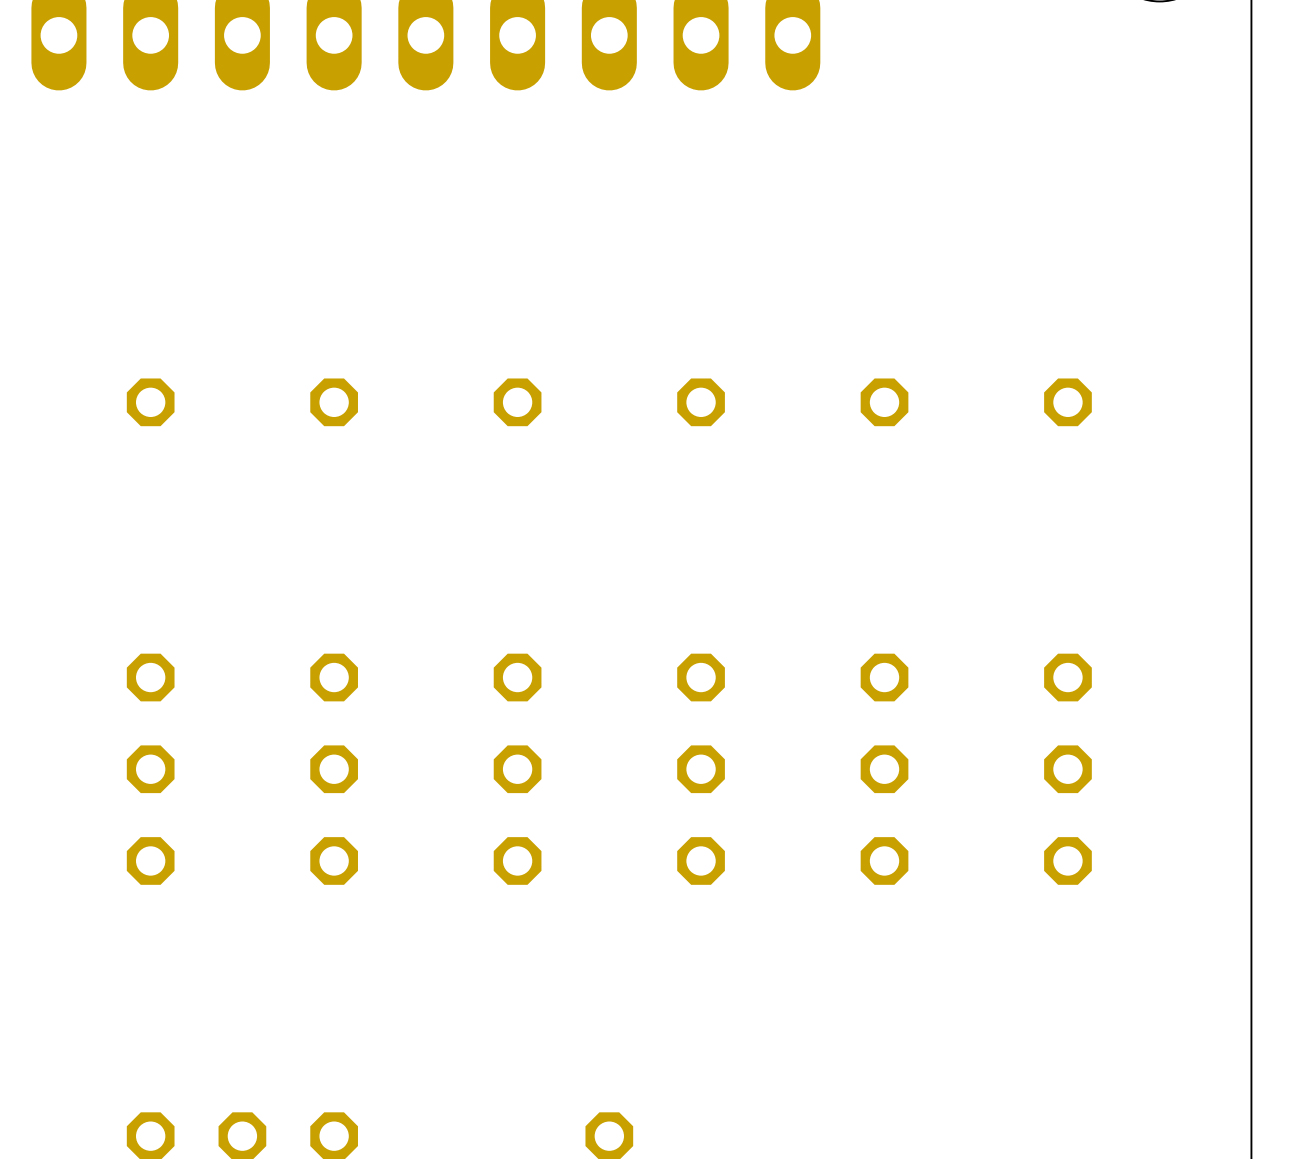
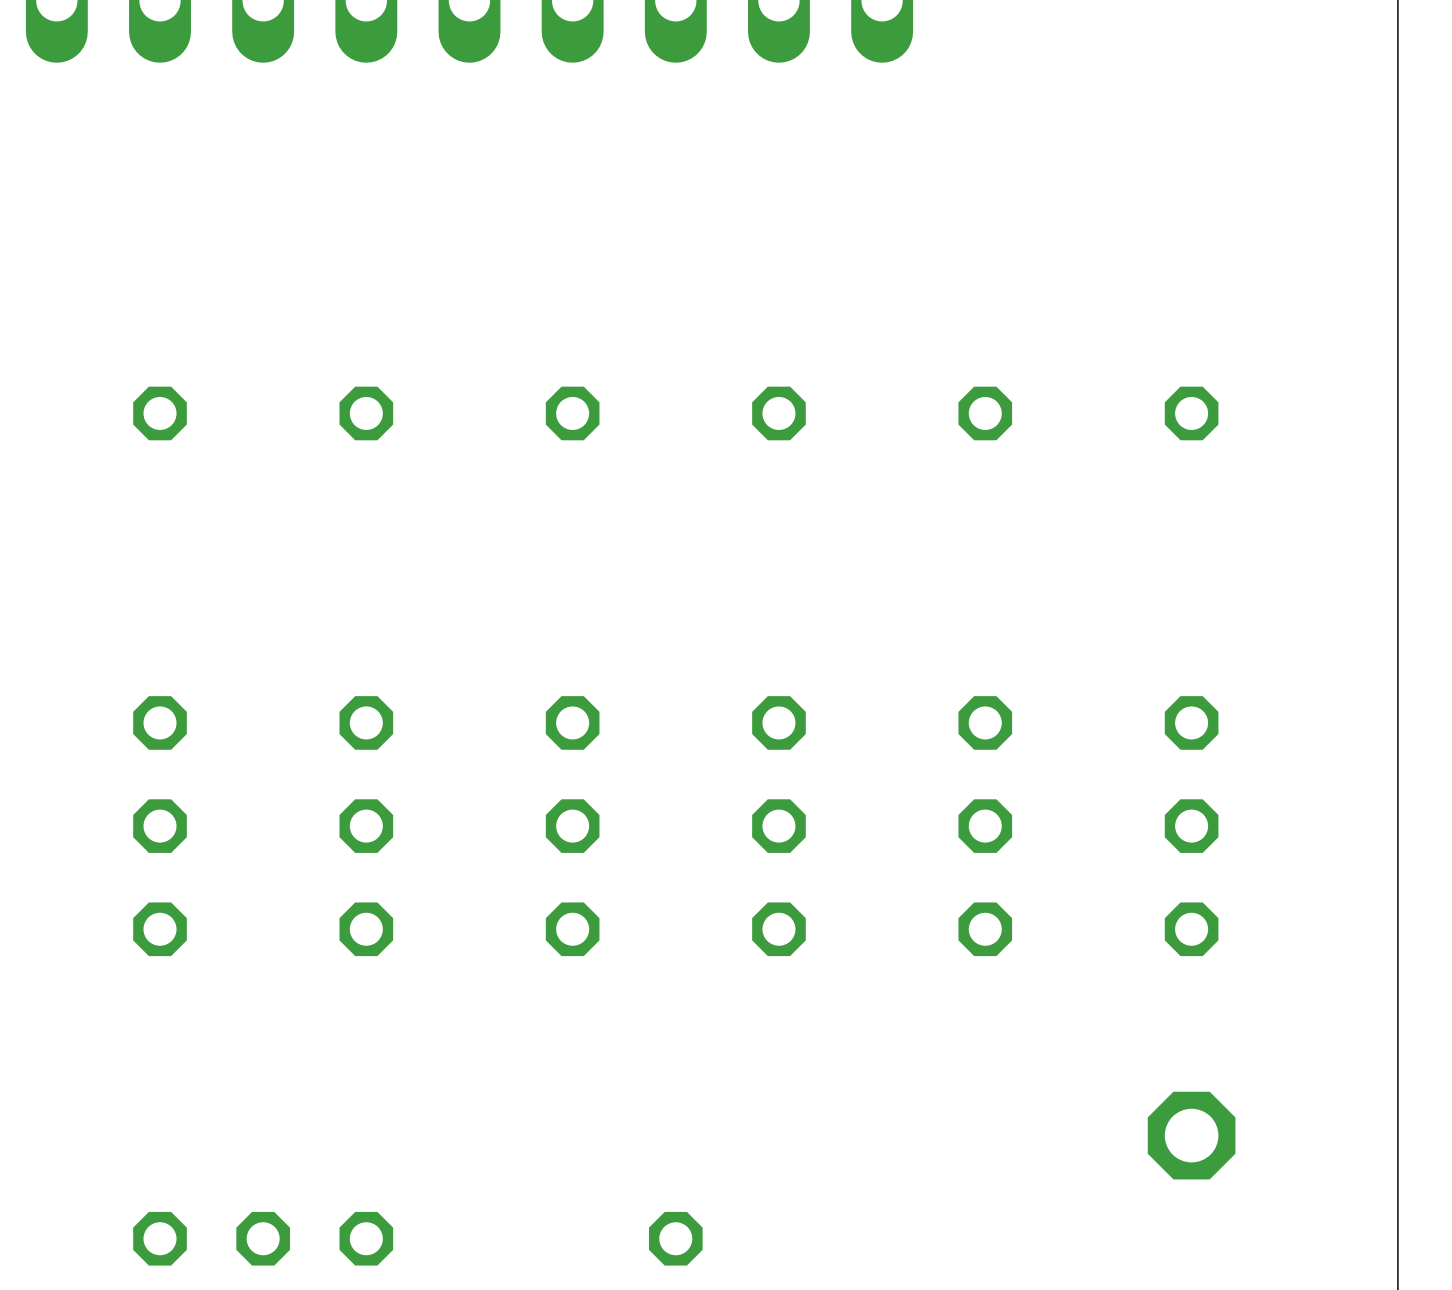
part: none -> (1191, 1135)

